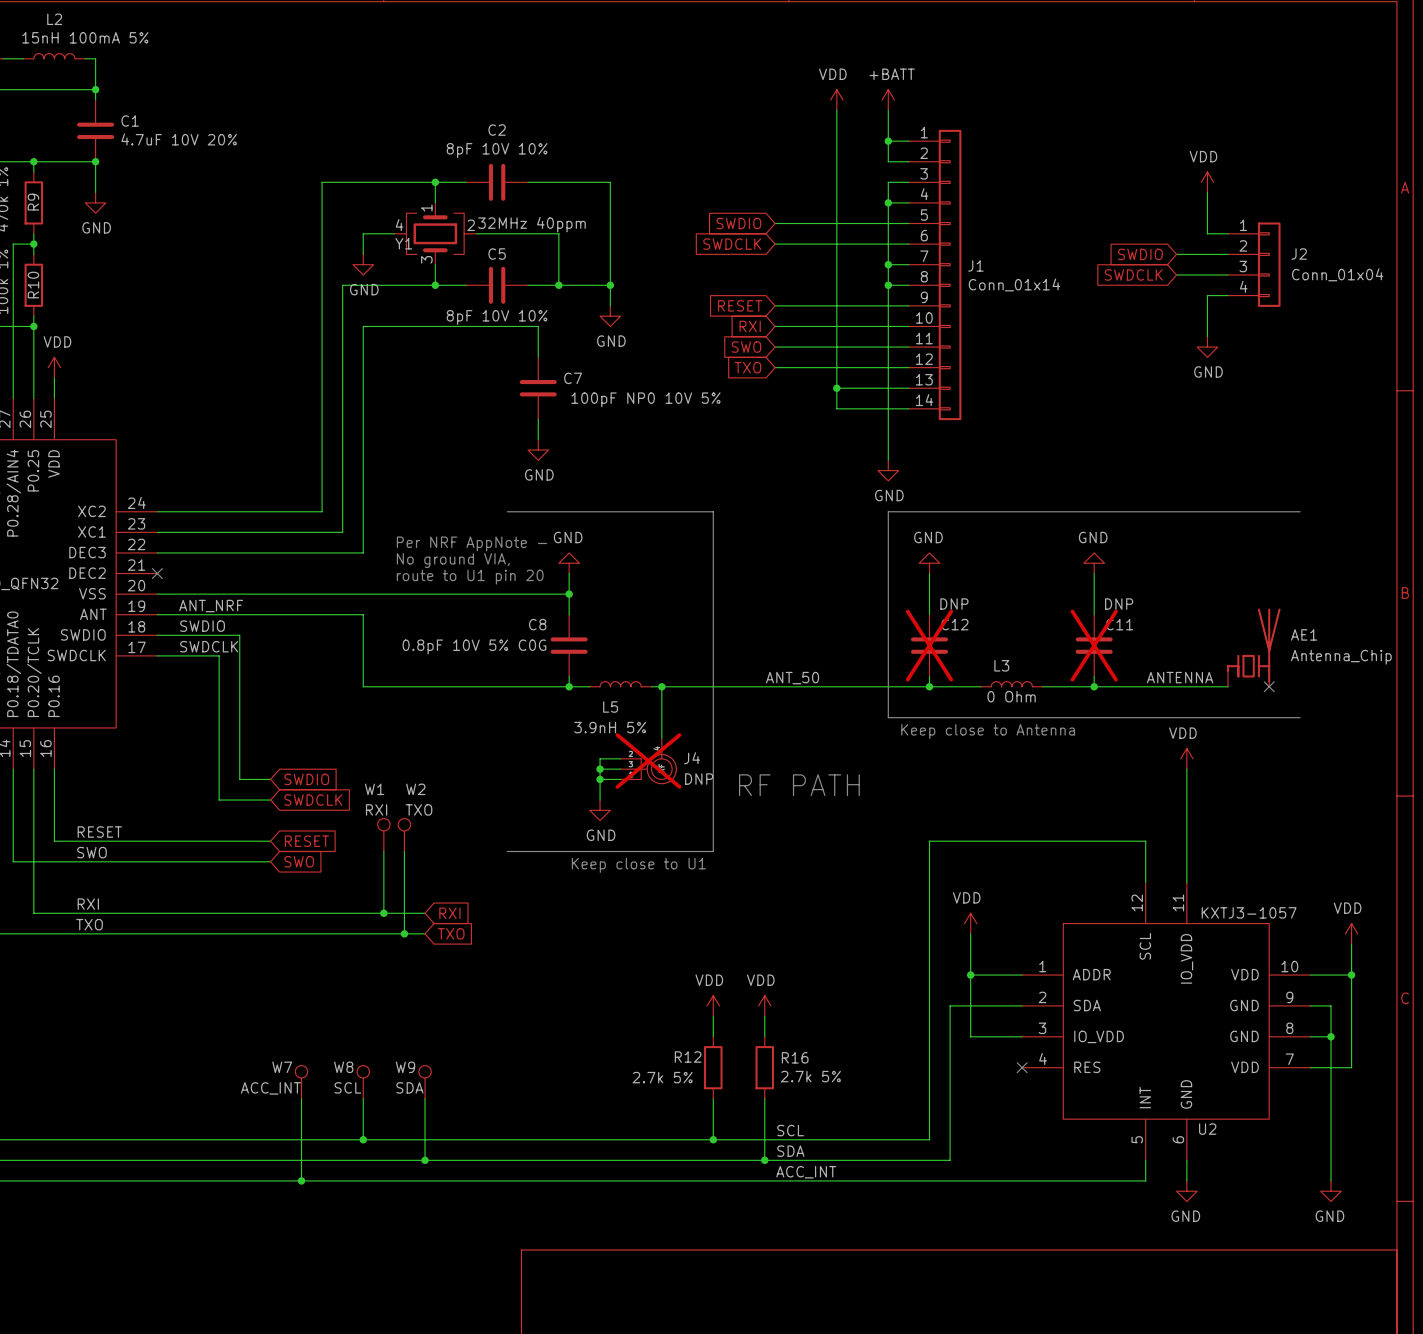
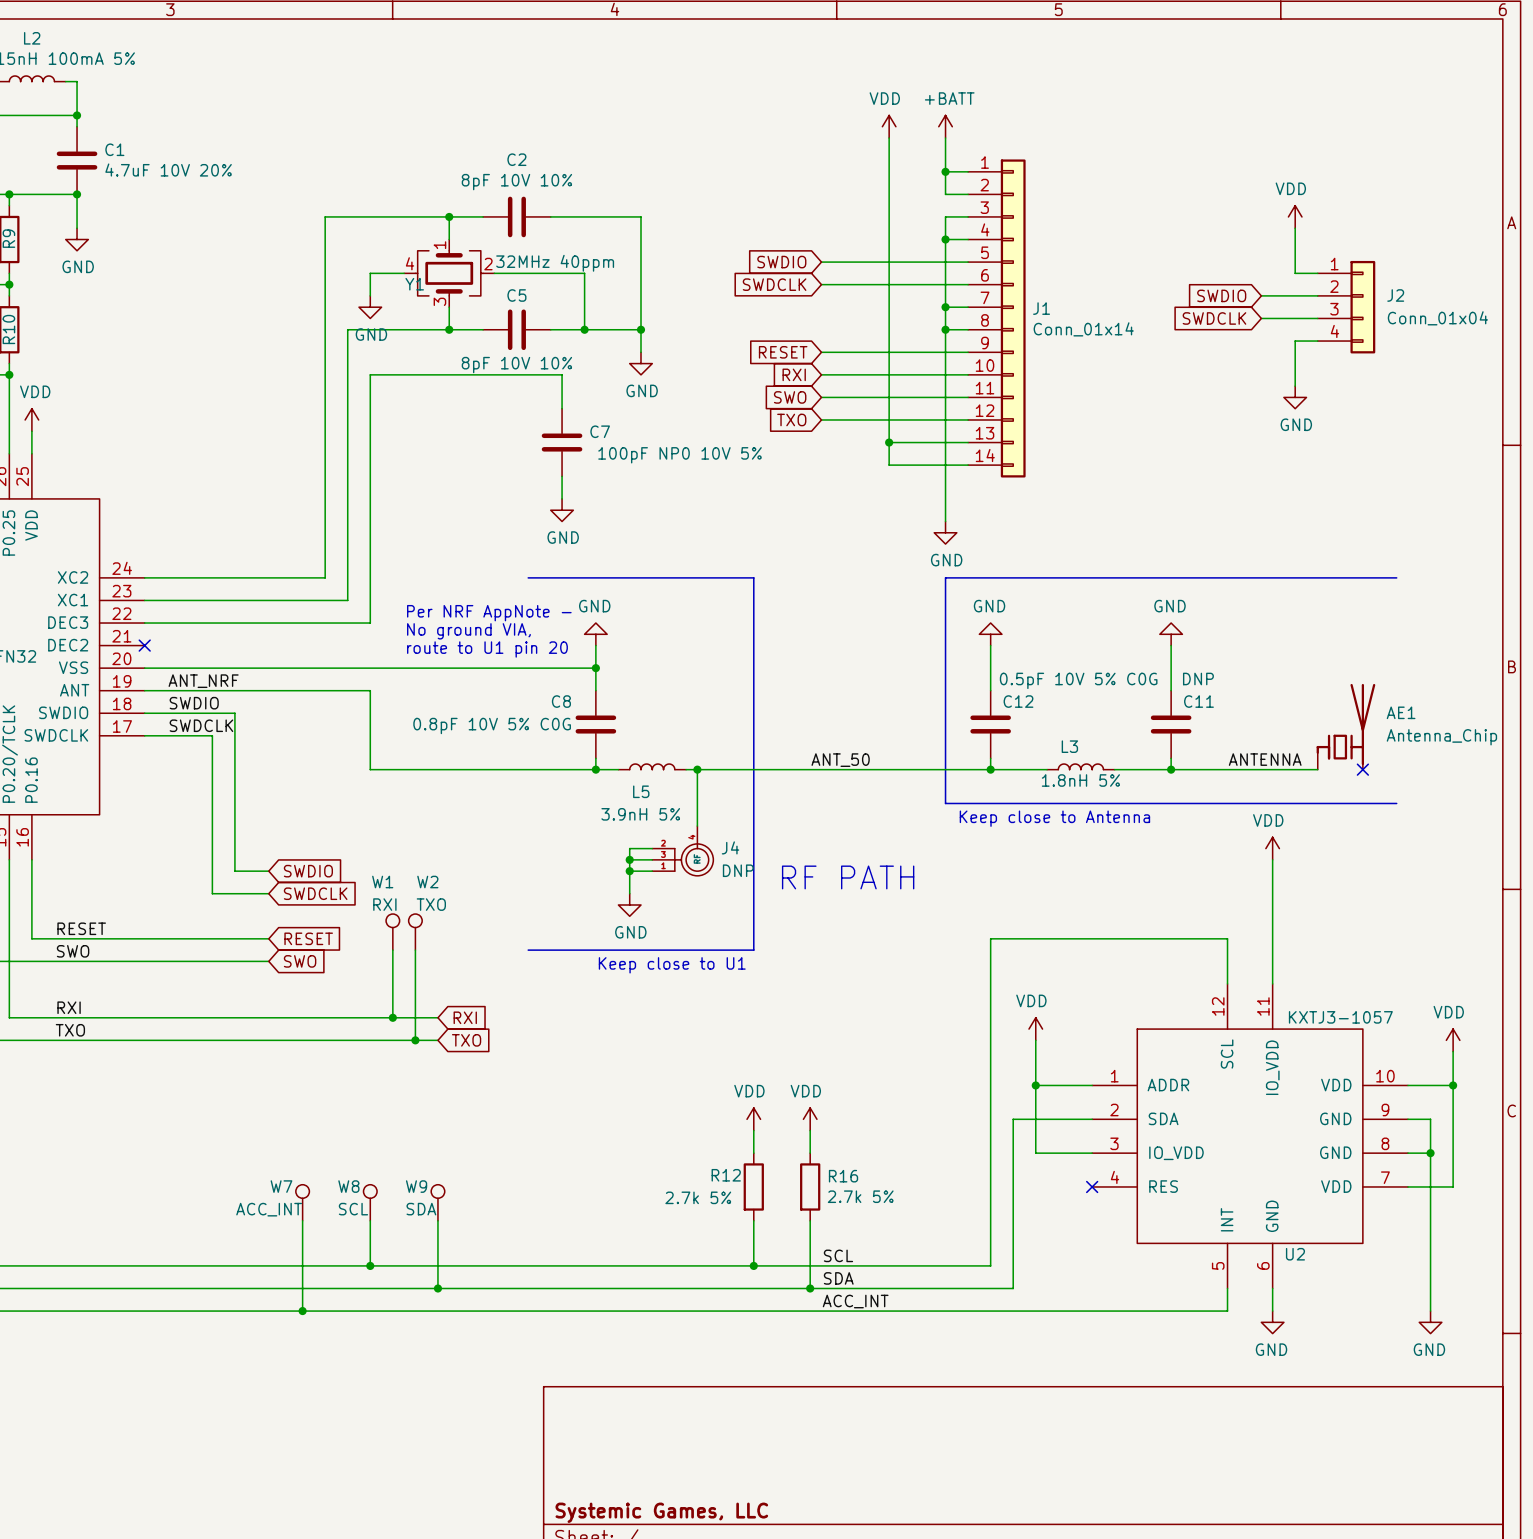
C12 value: DNP (954, 604) -> 0.5pF 10V 5% C0G (1078, 680)
C12 do-not-place cross: (929, 645) -> none
C11 do-not-place cross: (1094, 645) -> none
L3 value: 0 Ohm (1011, 696) -> 1.8nH 5% (1080, 780)
J4 do-not-place cross: (648, 760) -> none

